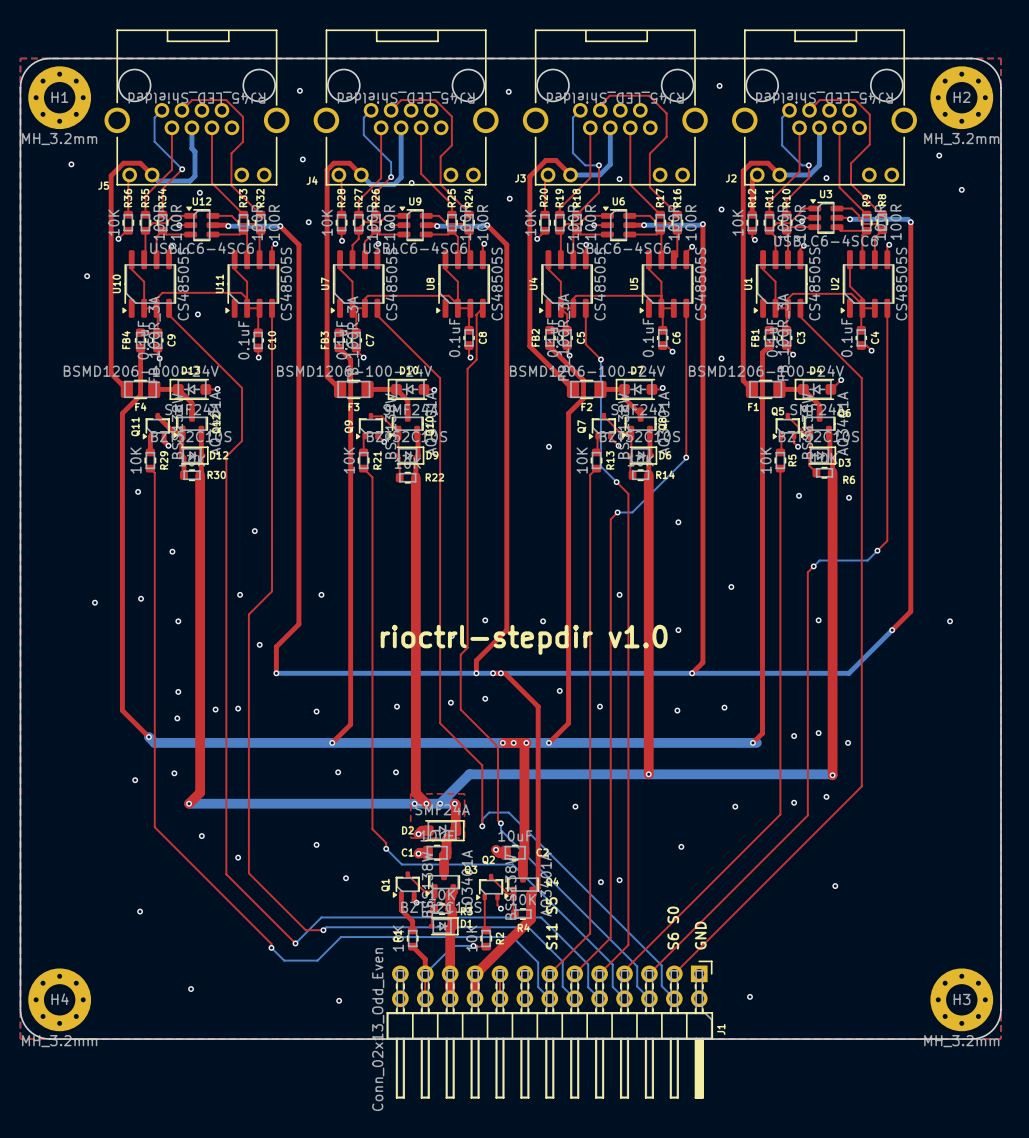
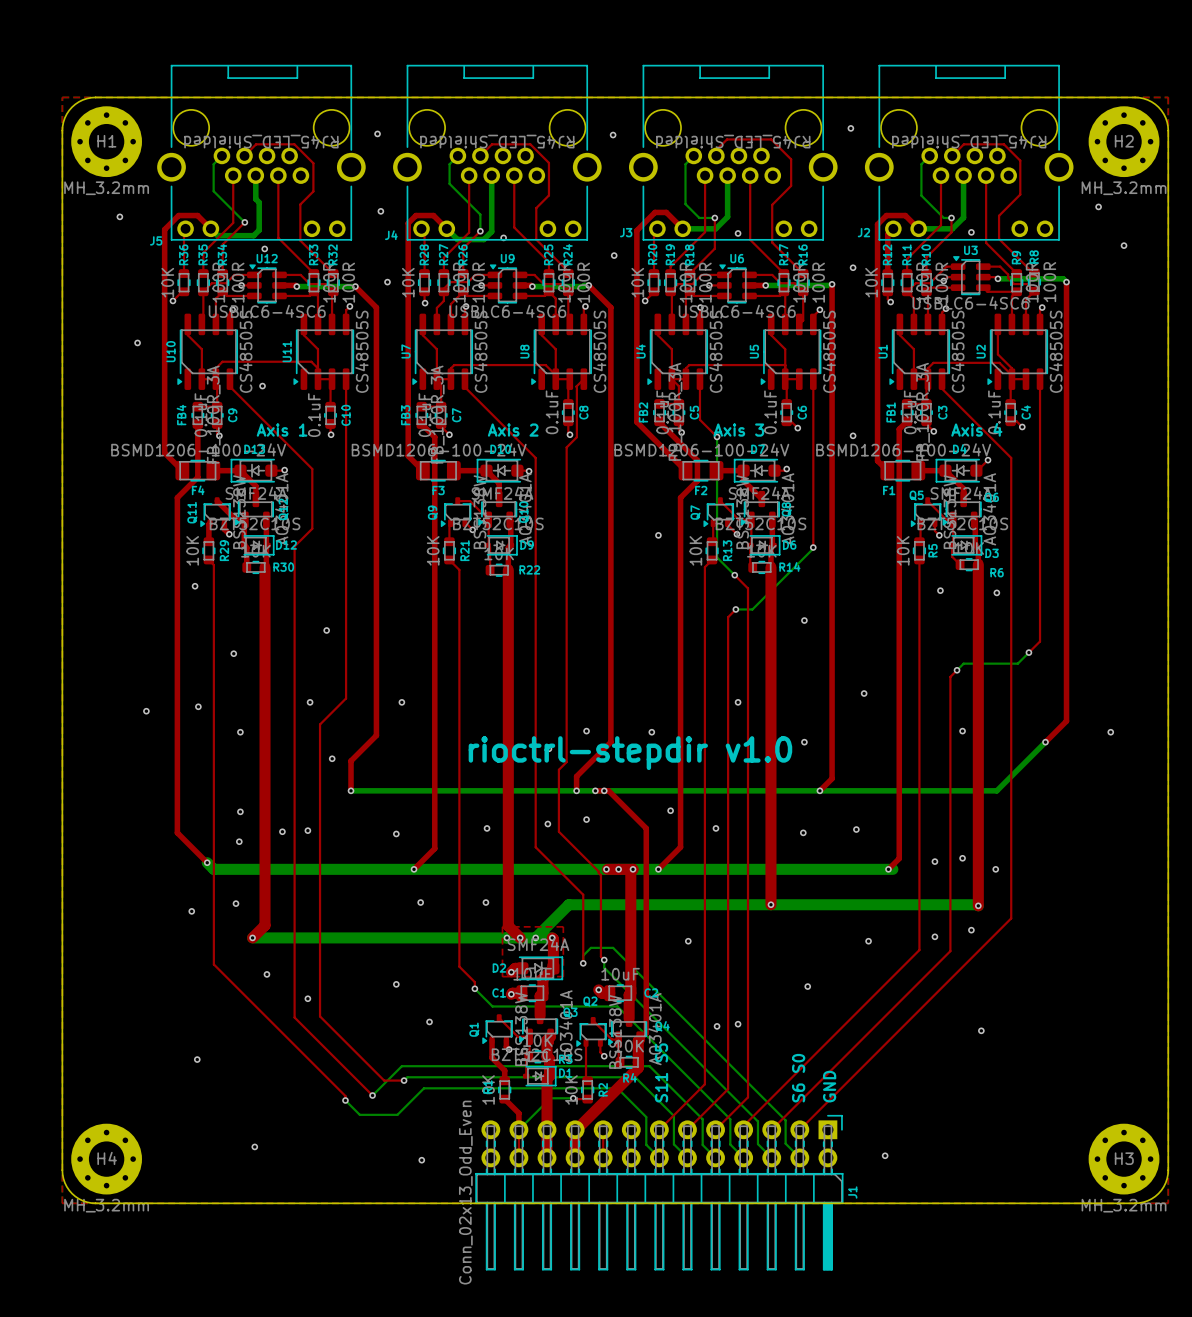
text: none -> Axis 1 (282, 430)
text: none -> Axis 2 (513, 430)
text: none -> Axis 3 (738, 430)
text: none -> Axis 4 (976, 429)

